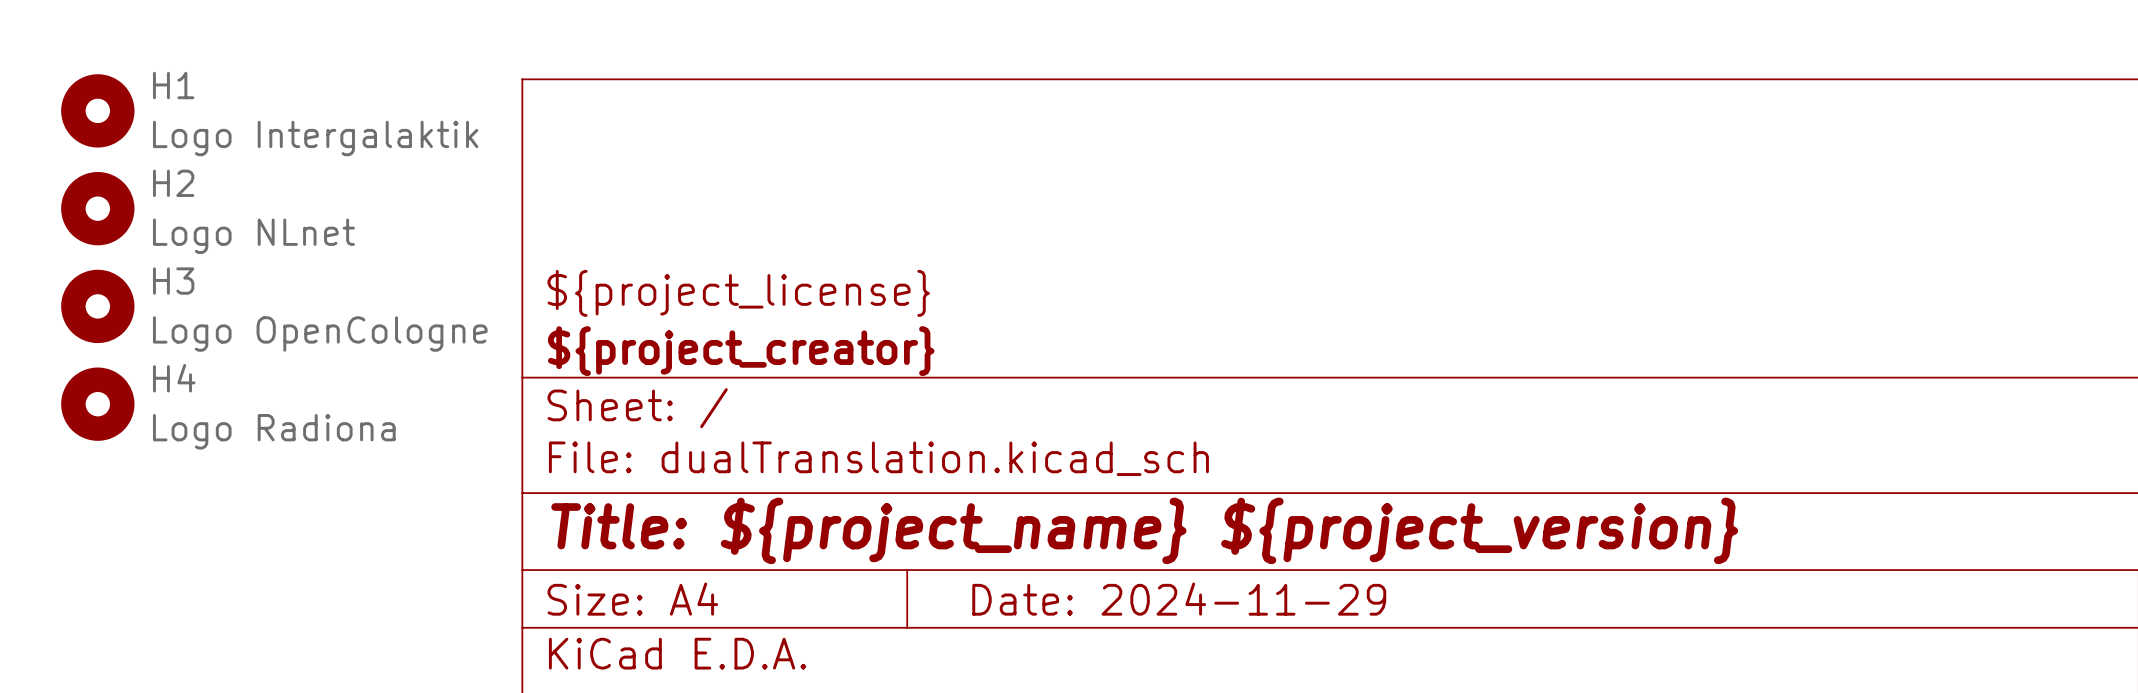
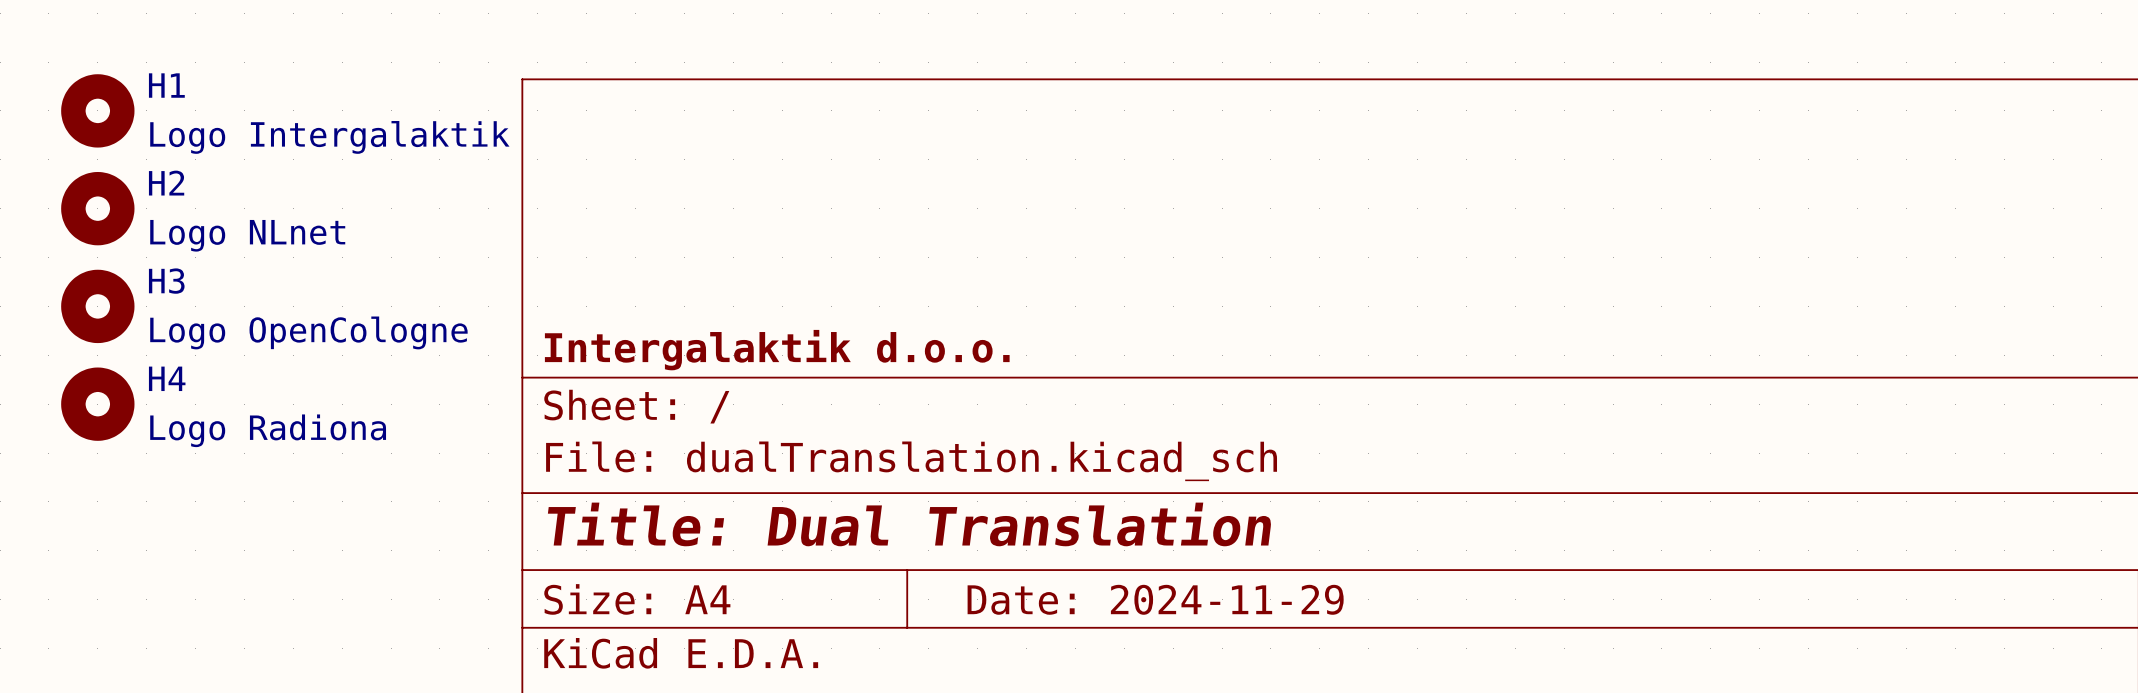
title block: ${project_license} (738, 293) -> none
title block: ${project_creator} (741, 351) -> Intergalaktik d.o.o. (777, 350)
title block: Title: ${project_name} ${project_version} (1144, 530) -> Title: Dual Translation (909, 524)

